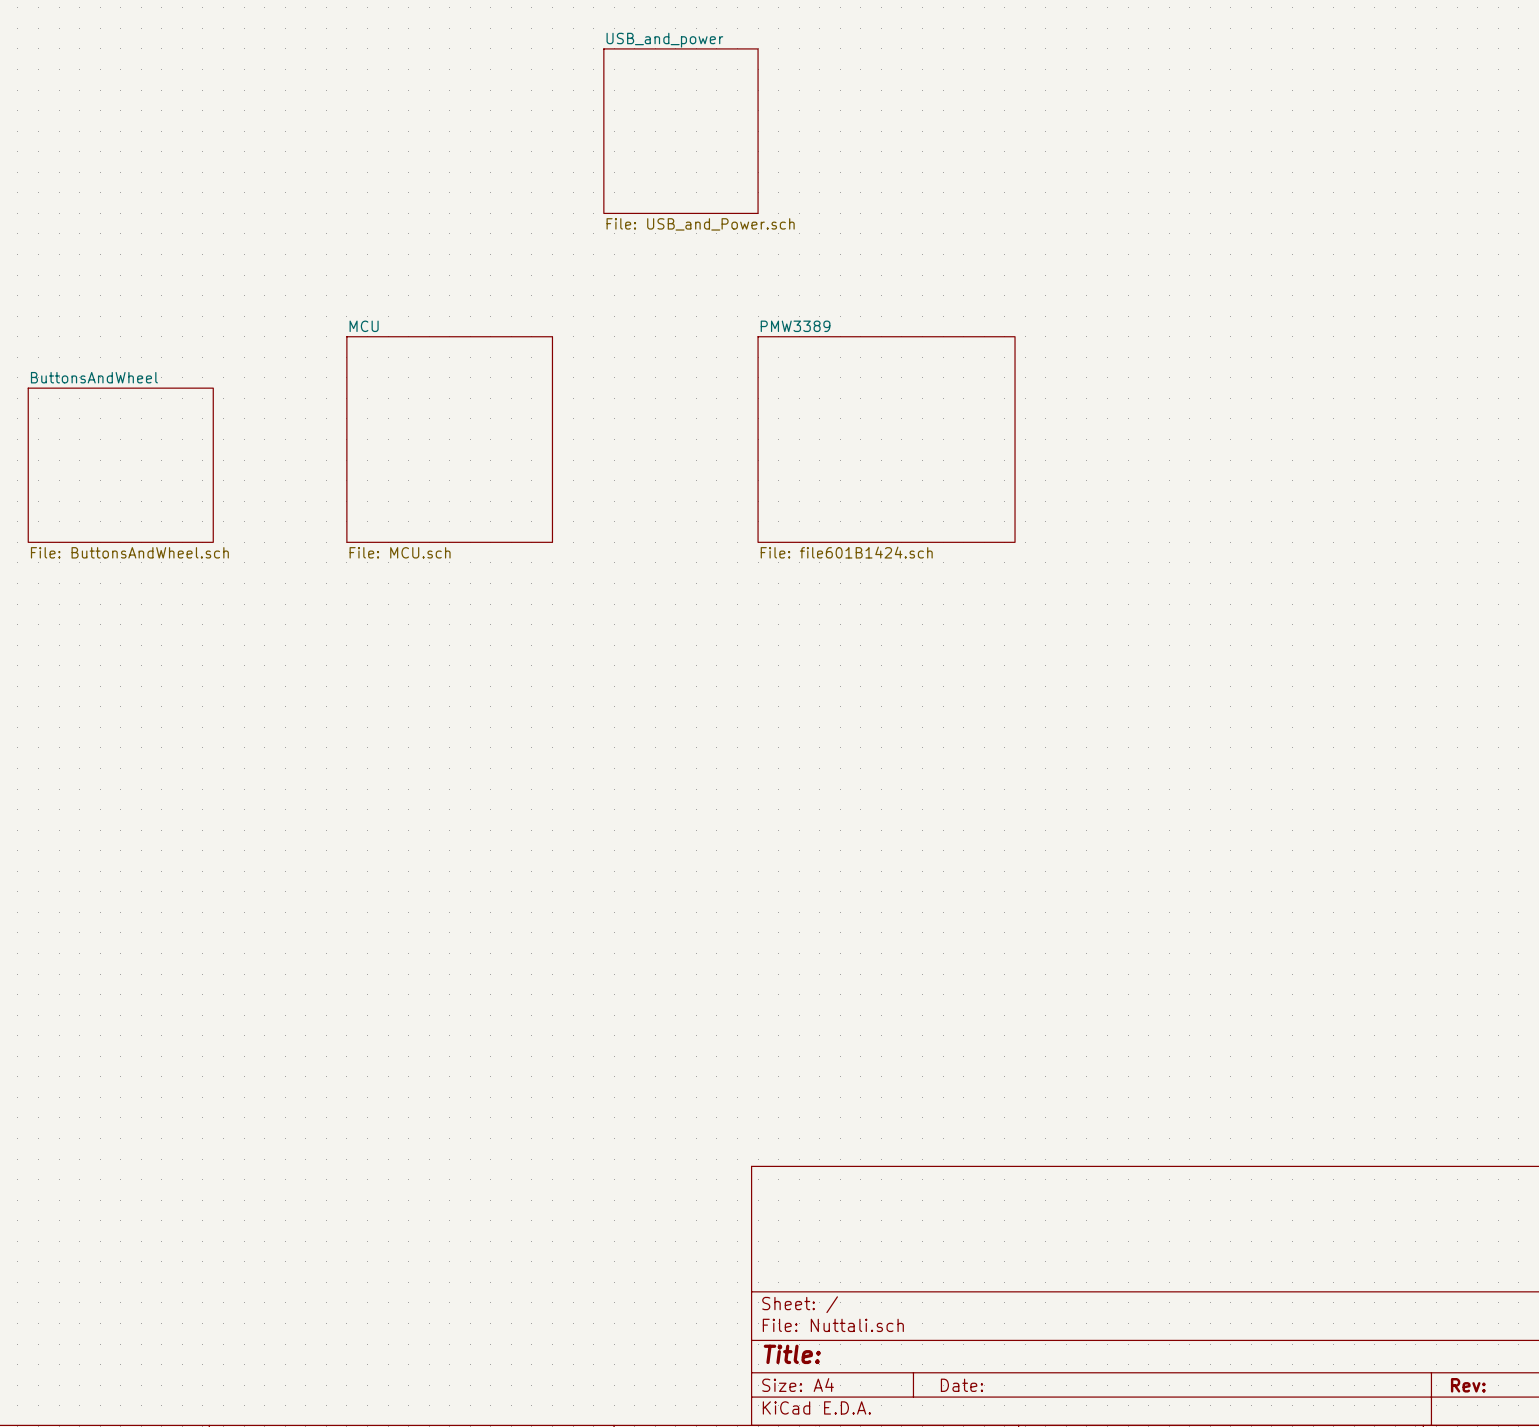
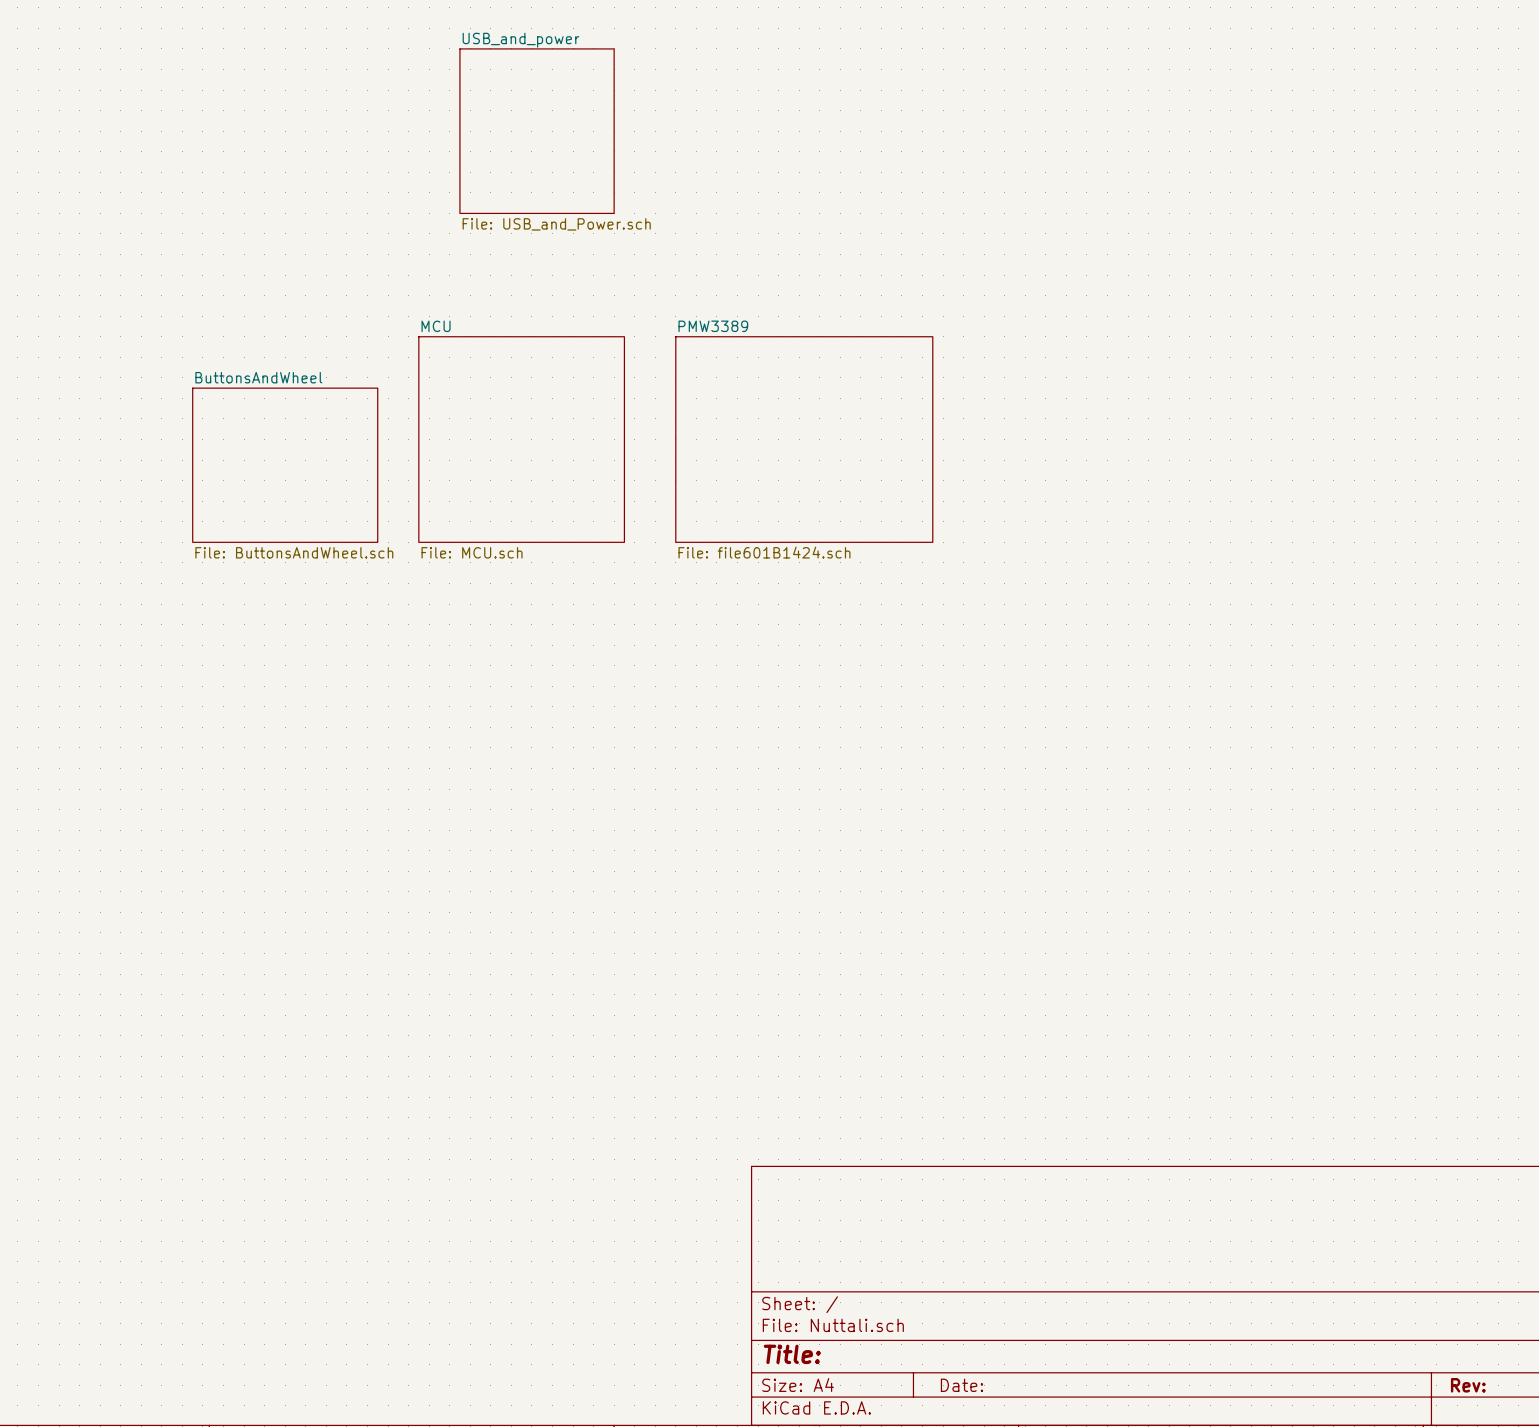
sheet USB_and_power position: (680, 131) -> (537, 131)
sheet MCU position: (449, 439) -> (521, 439)
sheet PMW3389 position: (886, 439) -> (804, 439)
sheet ButtonsAndWheel position: (120, 465) -> (285, 465)

